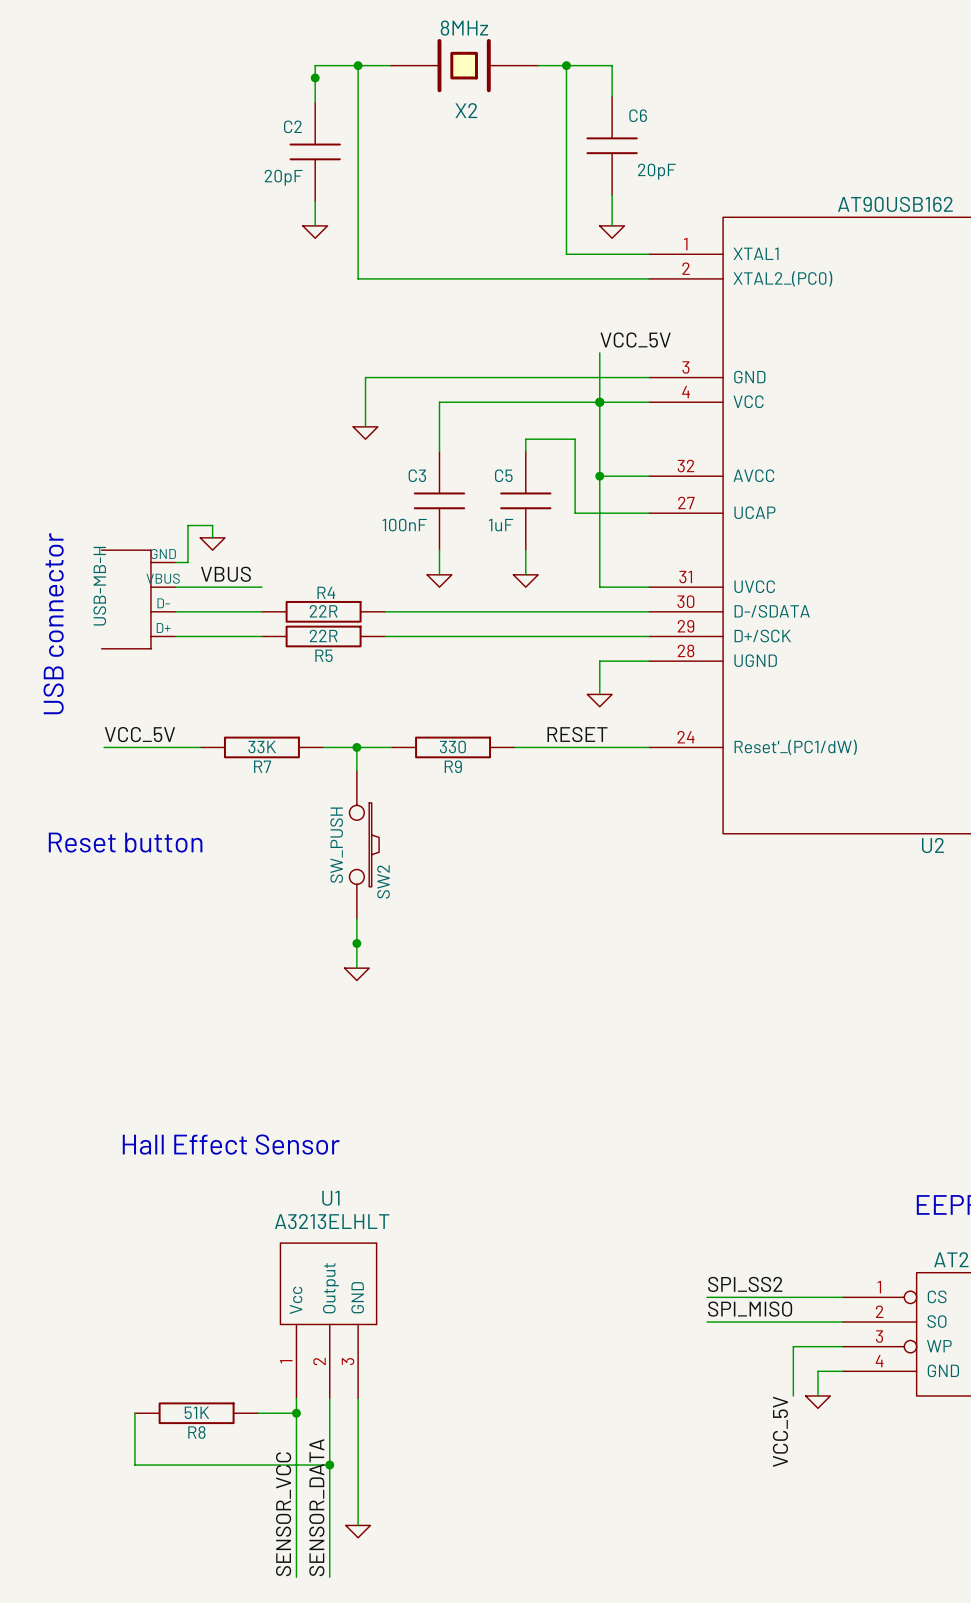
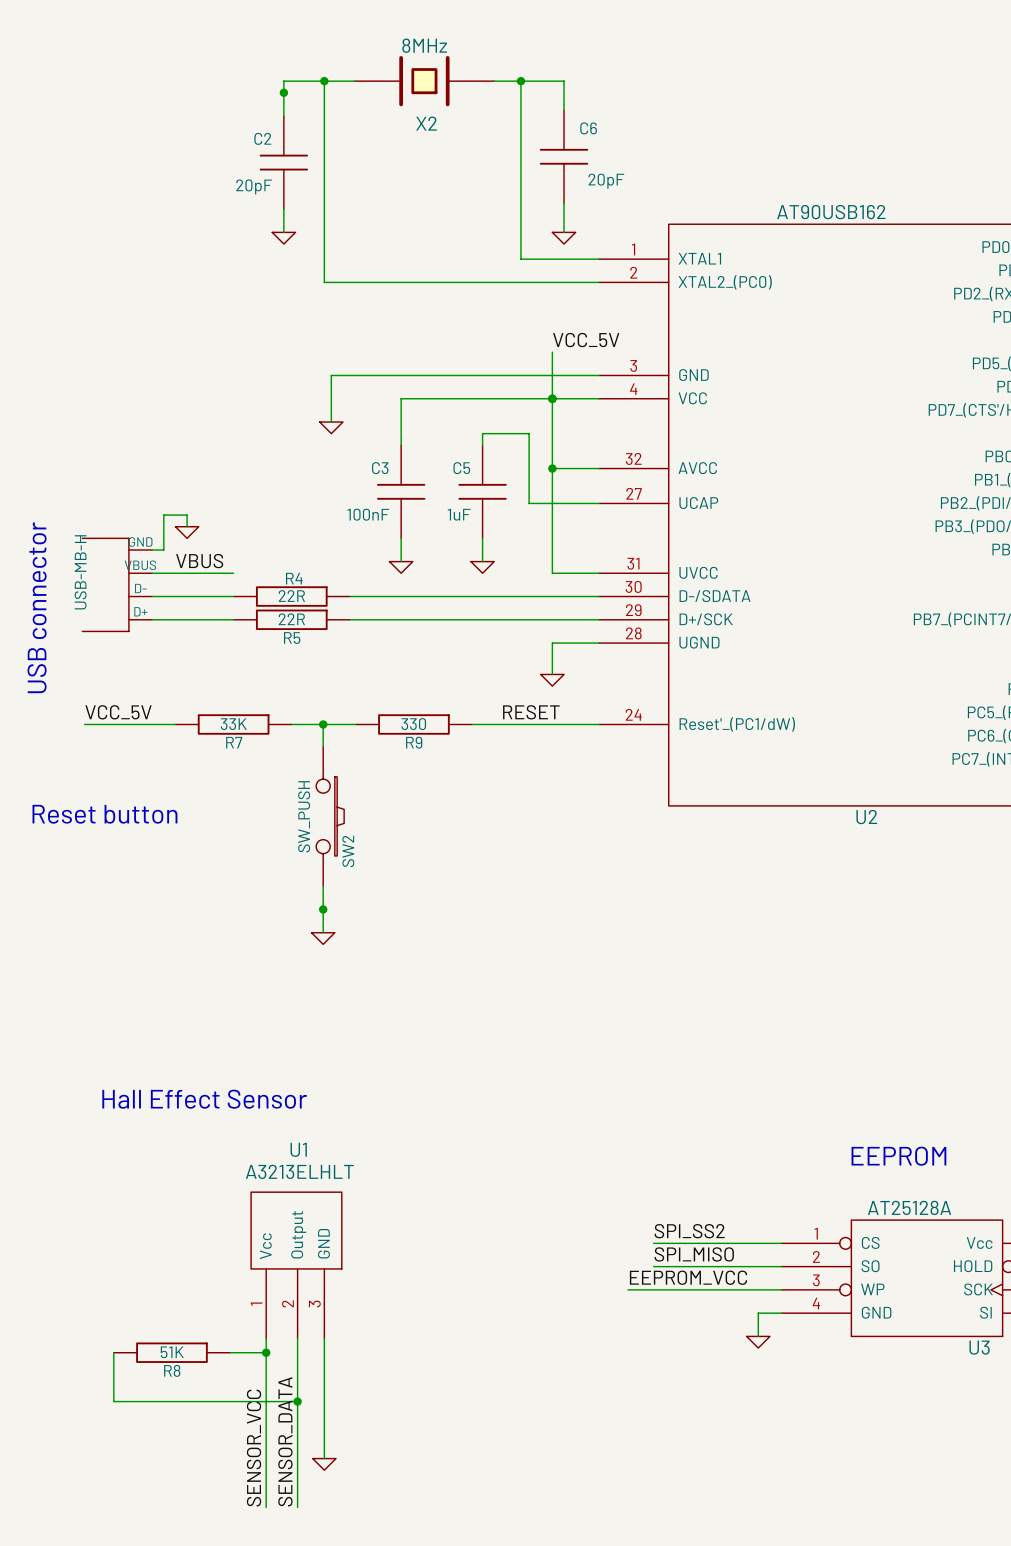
label: none -> EEPROM_VCC (688, 1277)
wire: (793, 1346) (793, 1395) -> (735, 1289) (628, 1289)
label: VCC_5V (780, 1431) -> none

